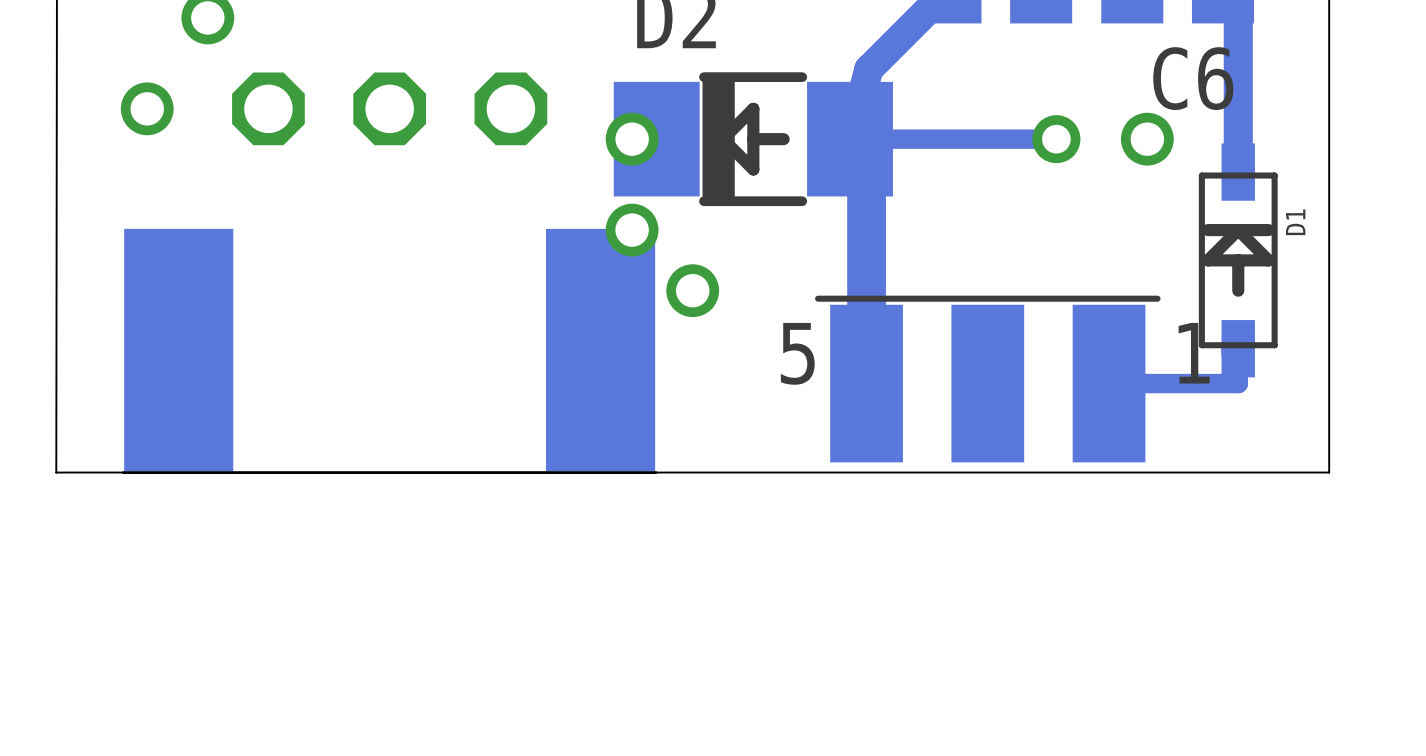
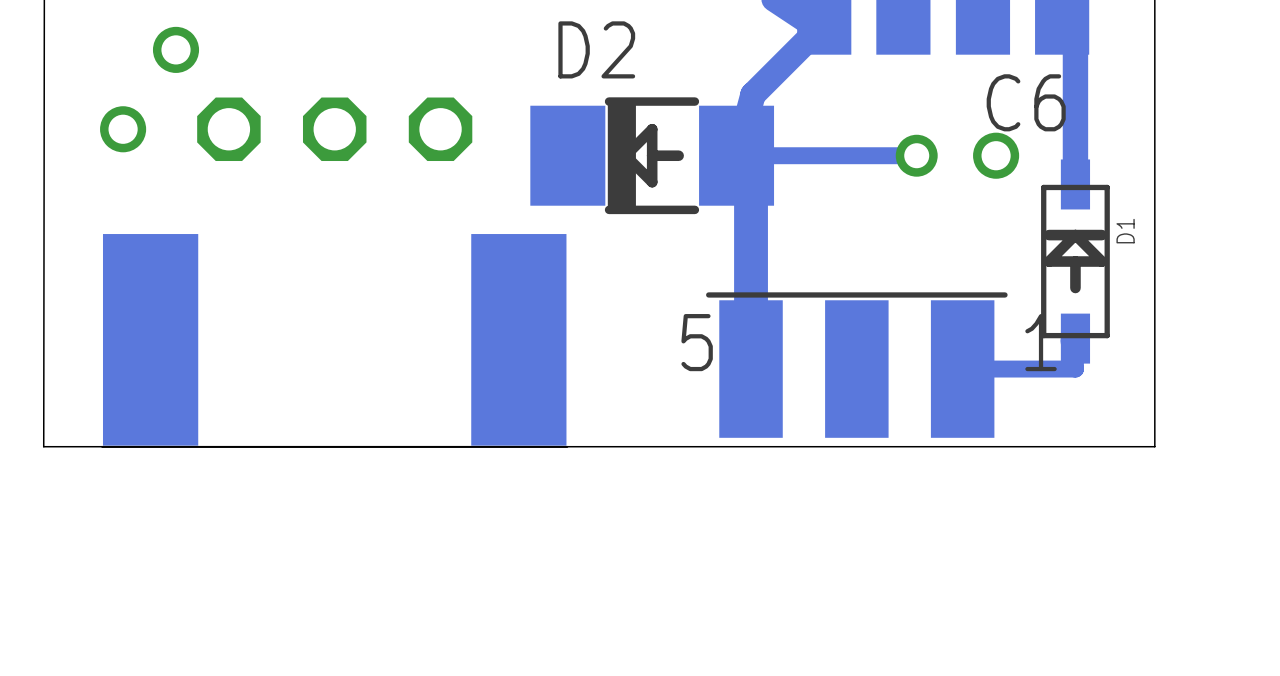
via: (632, 139) -> none
via: (632, 230) -> none
via: (692, 290) -> none

